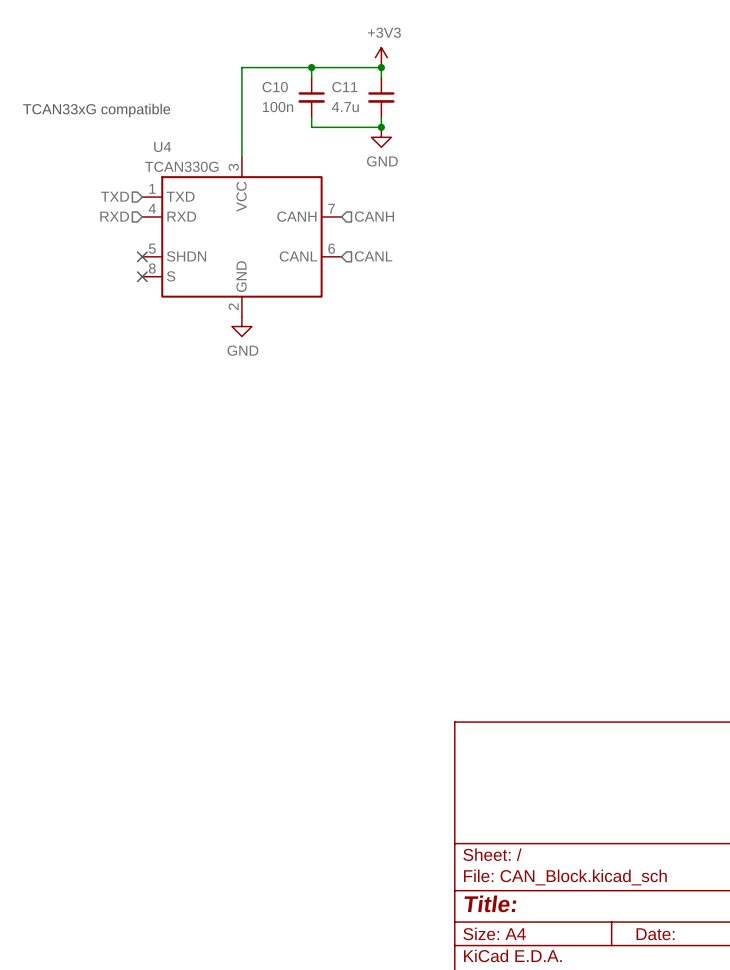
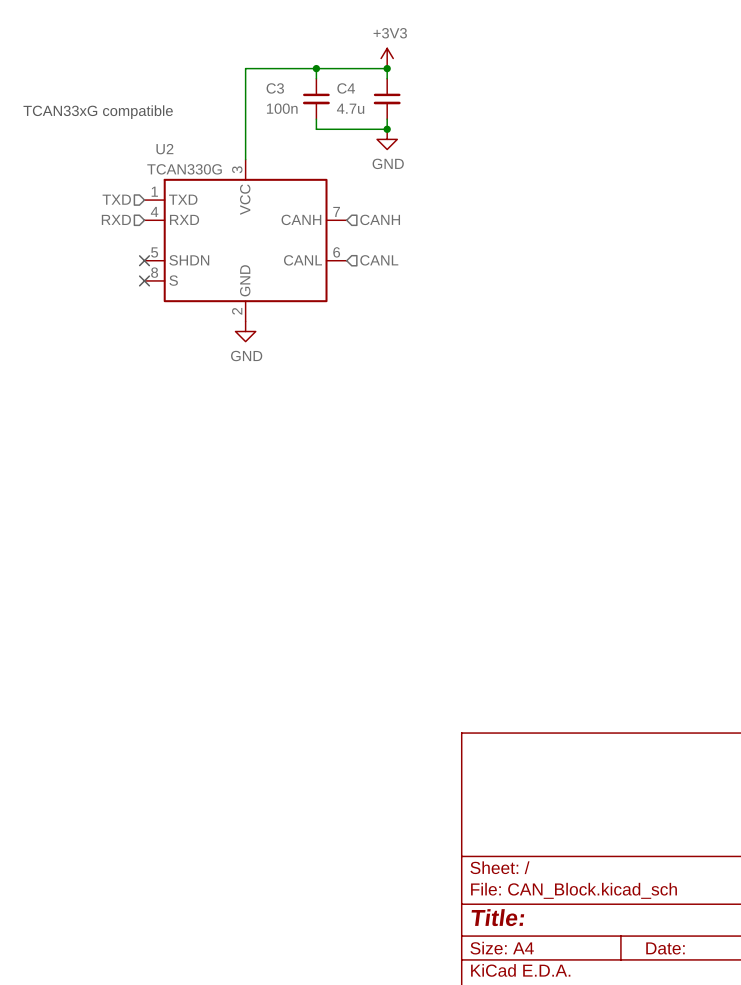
C10 name: C10 (275, 87) -> C3 (275, 88)
C11 name: C11 (344, 87) -> C4 (346, 88)
U4 name: U4 (162, 146) -> U2 (164, 149)

